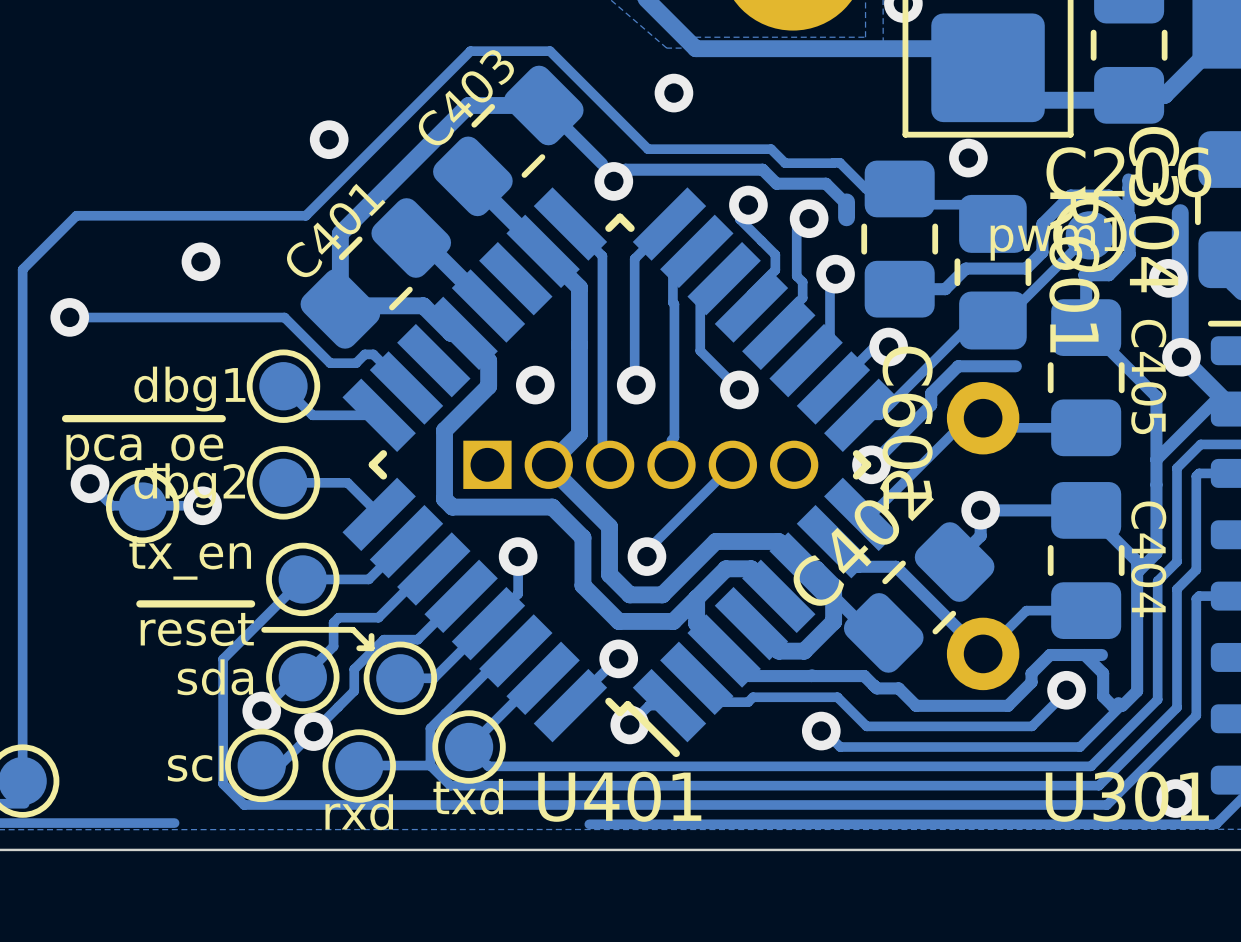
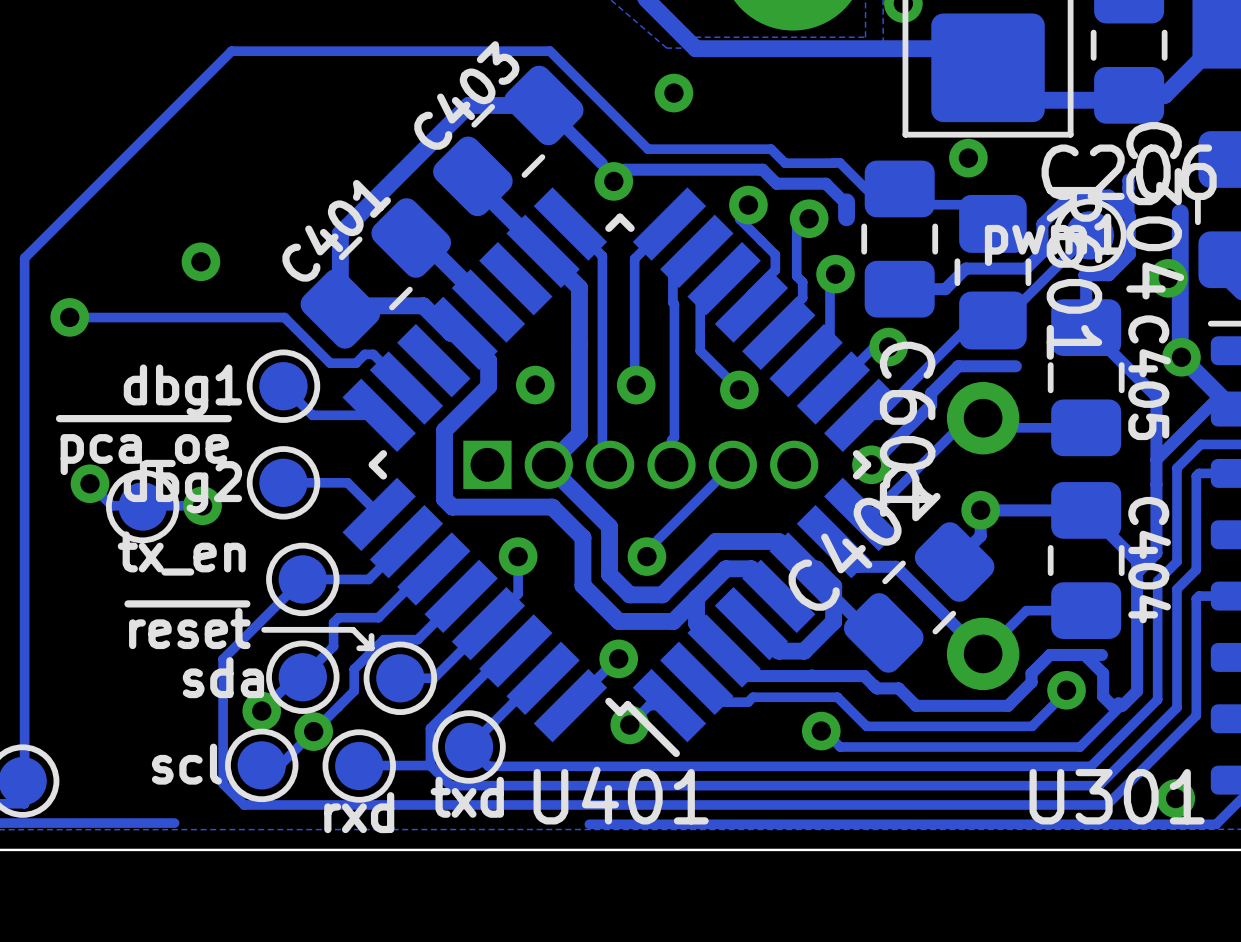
track: (470, 51) (305, 215) (76, 215) (22, 269) (22, 781) -> (470, 51) (231, 51) (24, 258) (24, 803)
via: (329, 139) -> none

